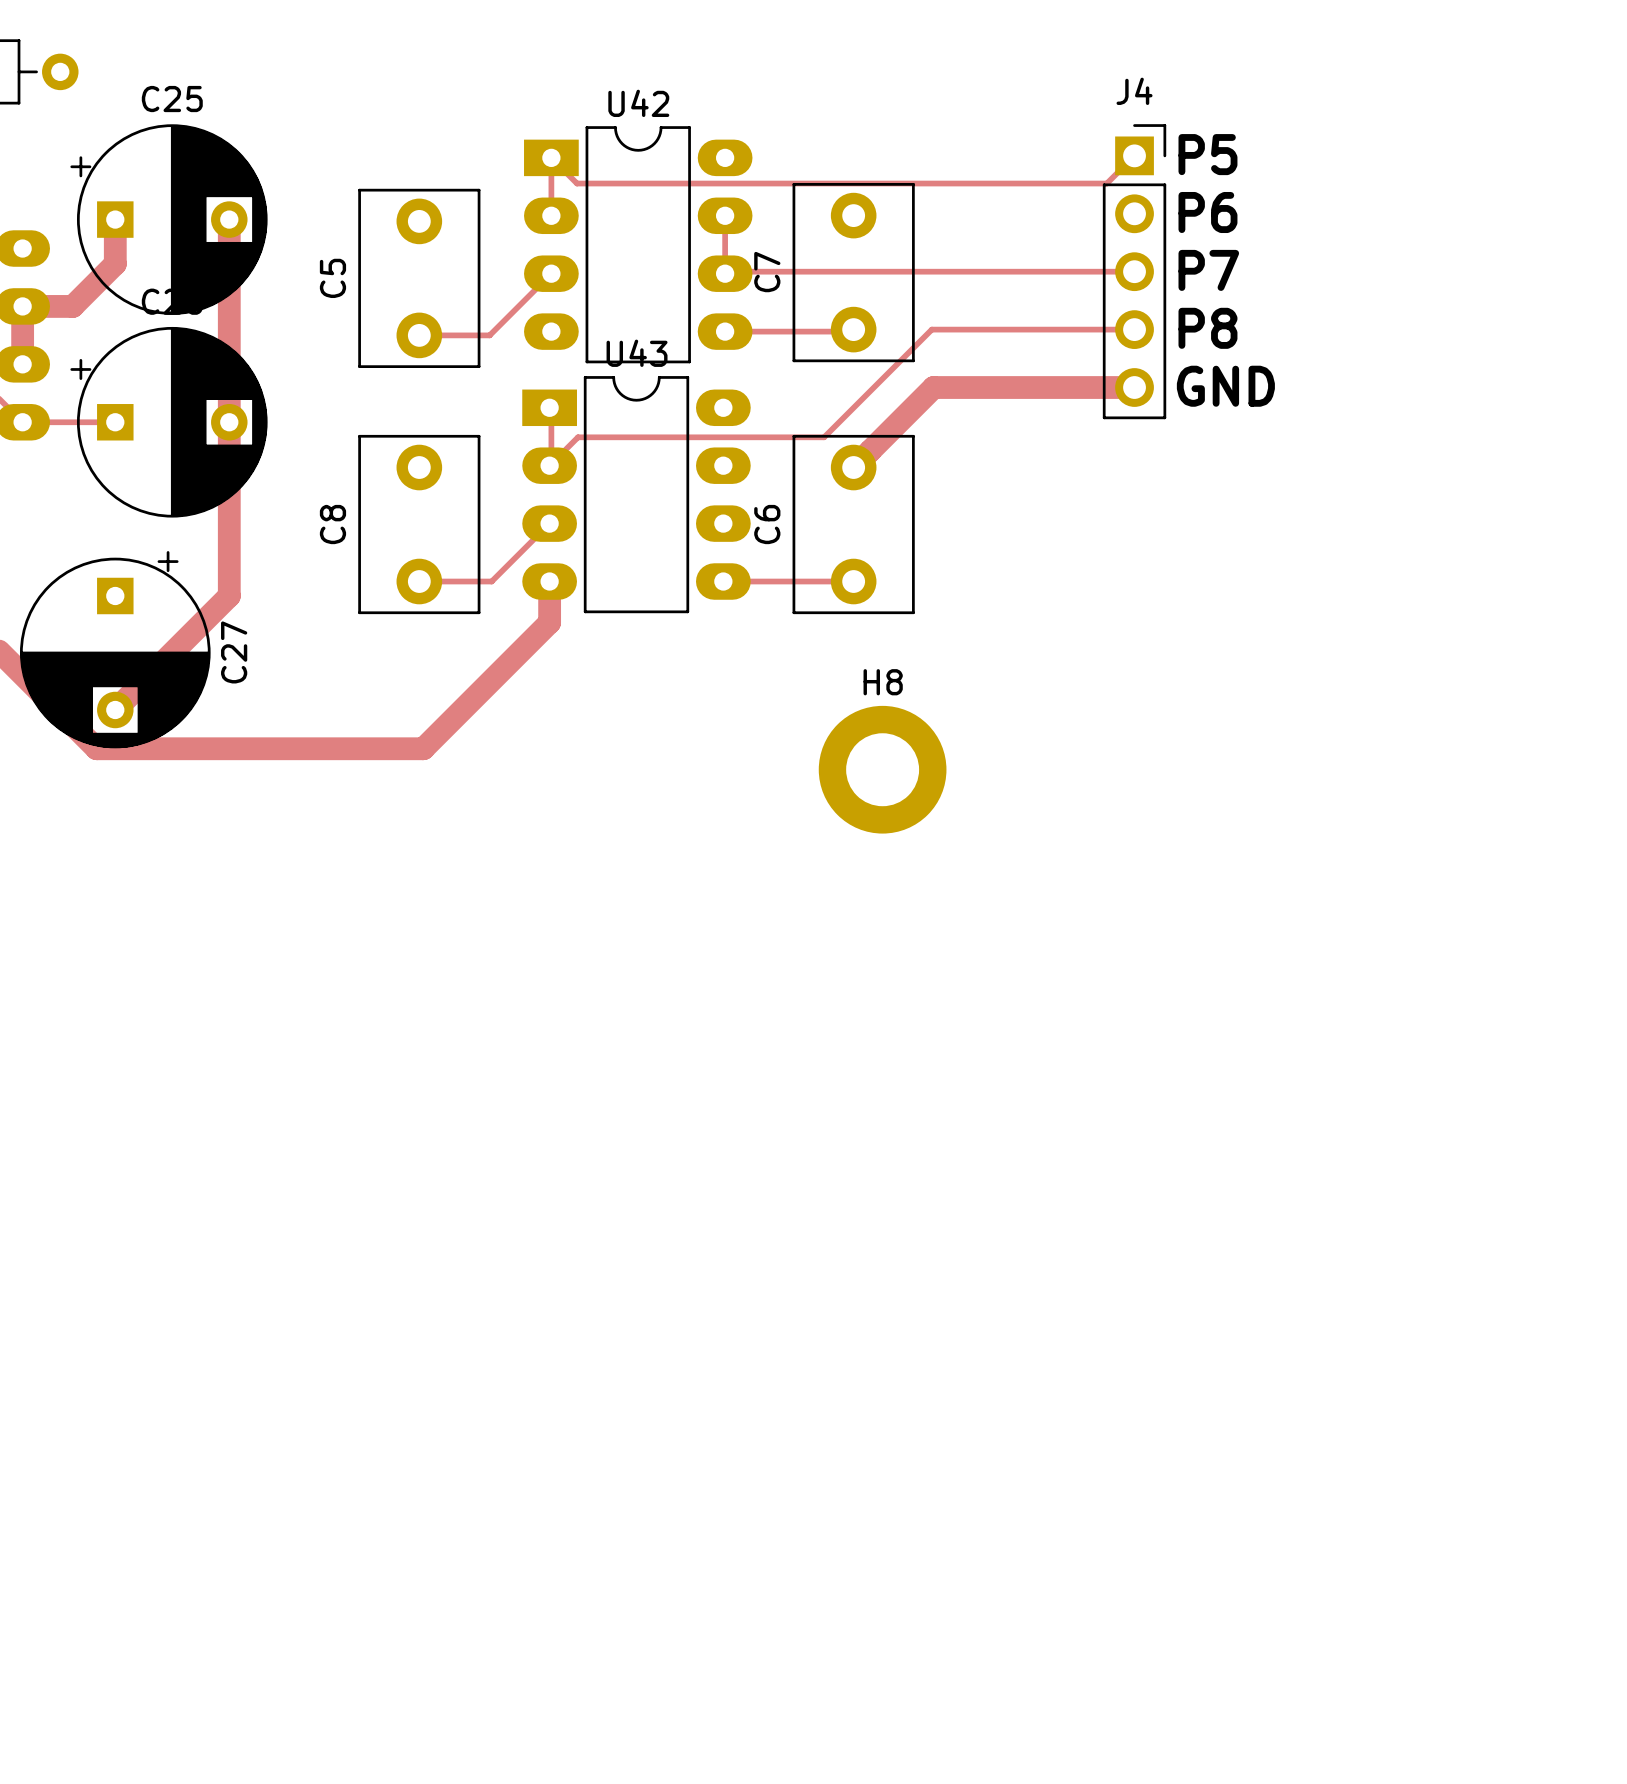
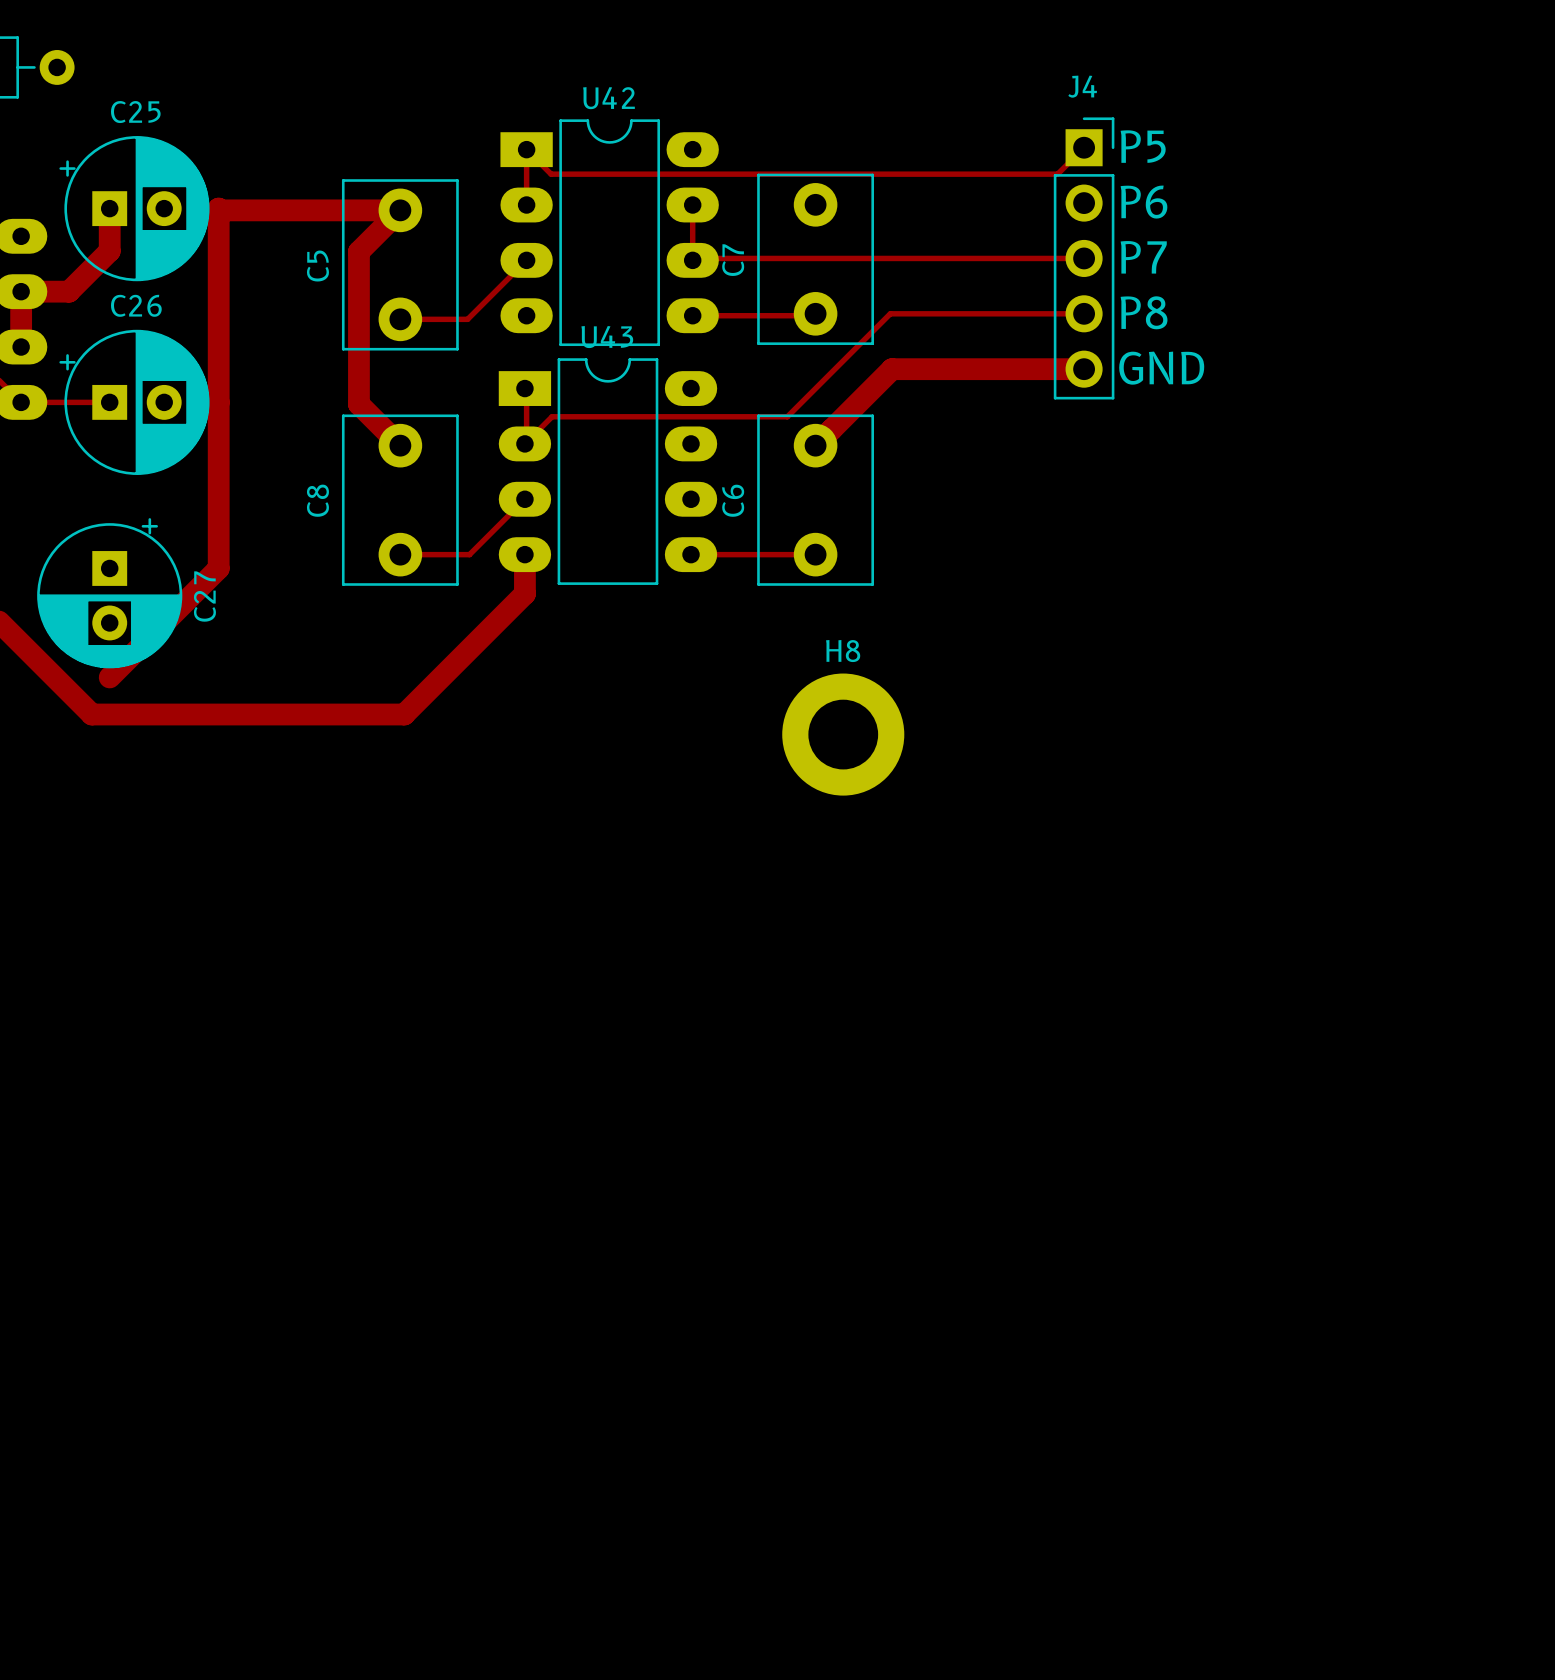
C25 footprint: [70, 124, 268, 315] -> [59, 136, 210, 282]
track: none -> (218, 208) (220, 210) (400, 210) (358, 251) (358, 404) (400, 445)
C26 footprint: [70, 326, 268, 518] -> [59, 329, 210, 475]
C27 footprint: [19, 551, 211, 749] -> [37, 518, 183, 669]

